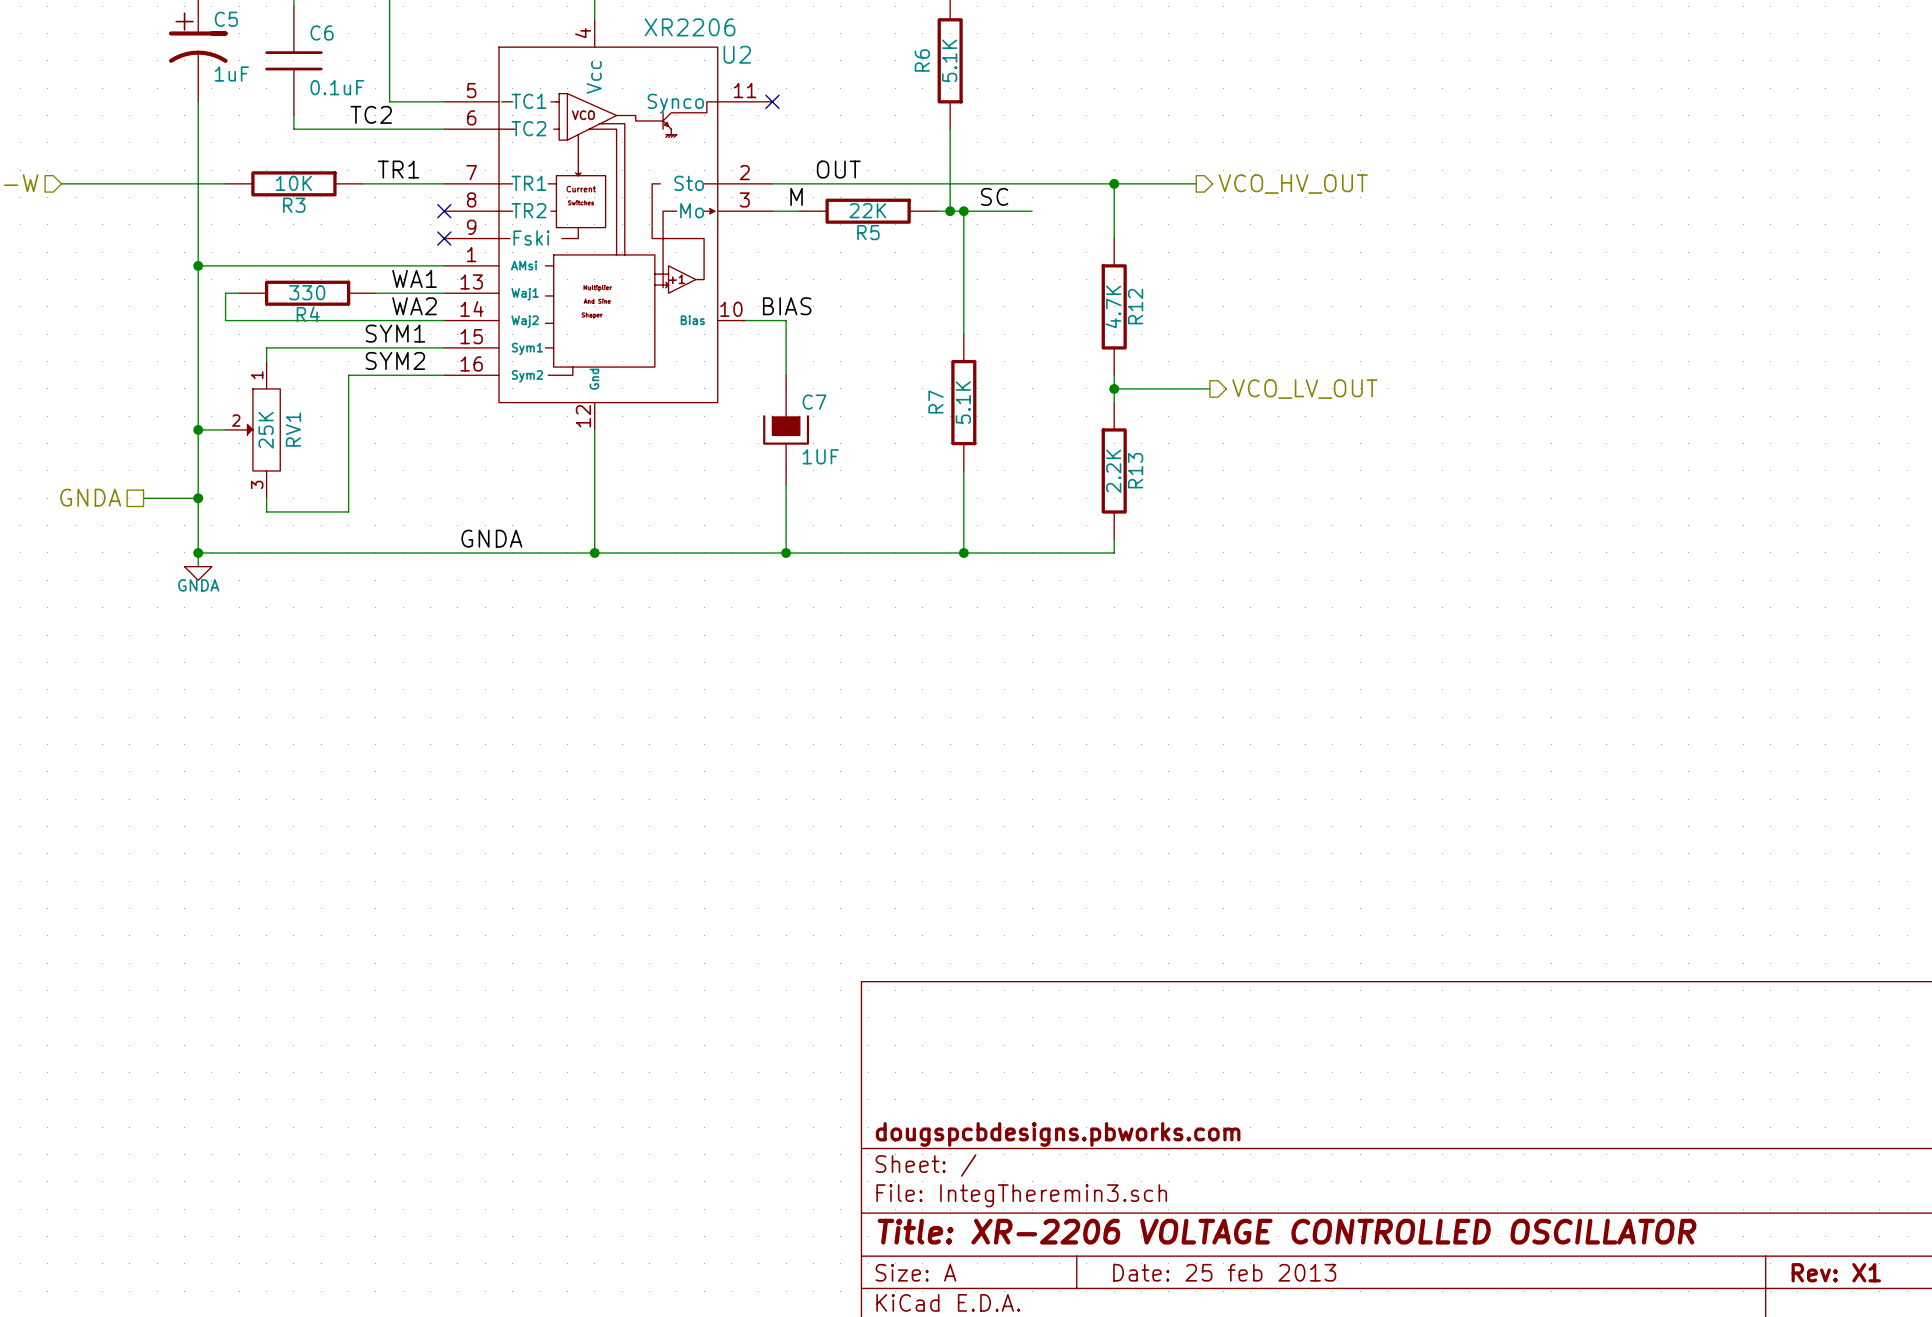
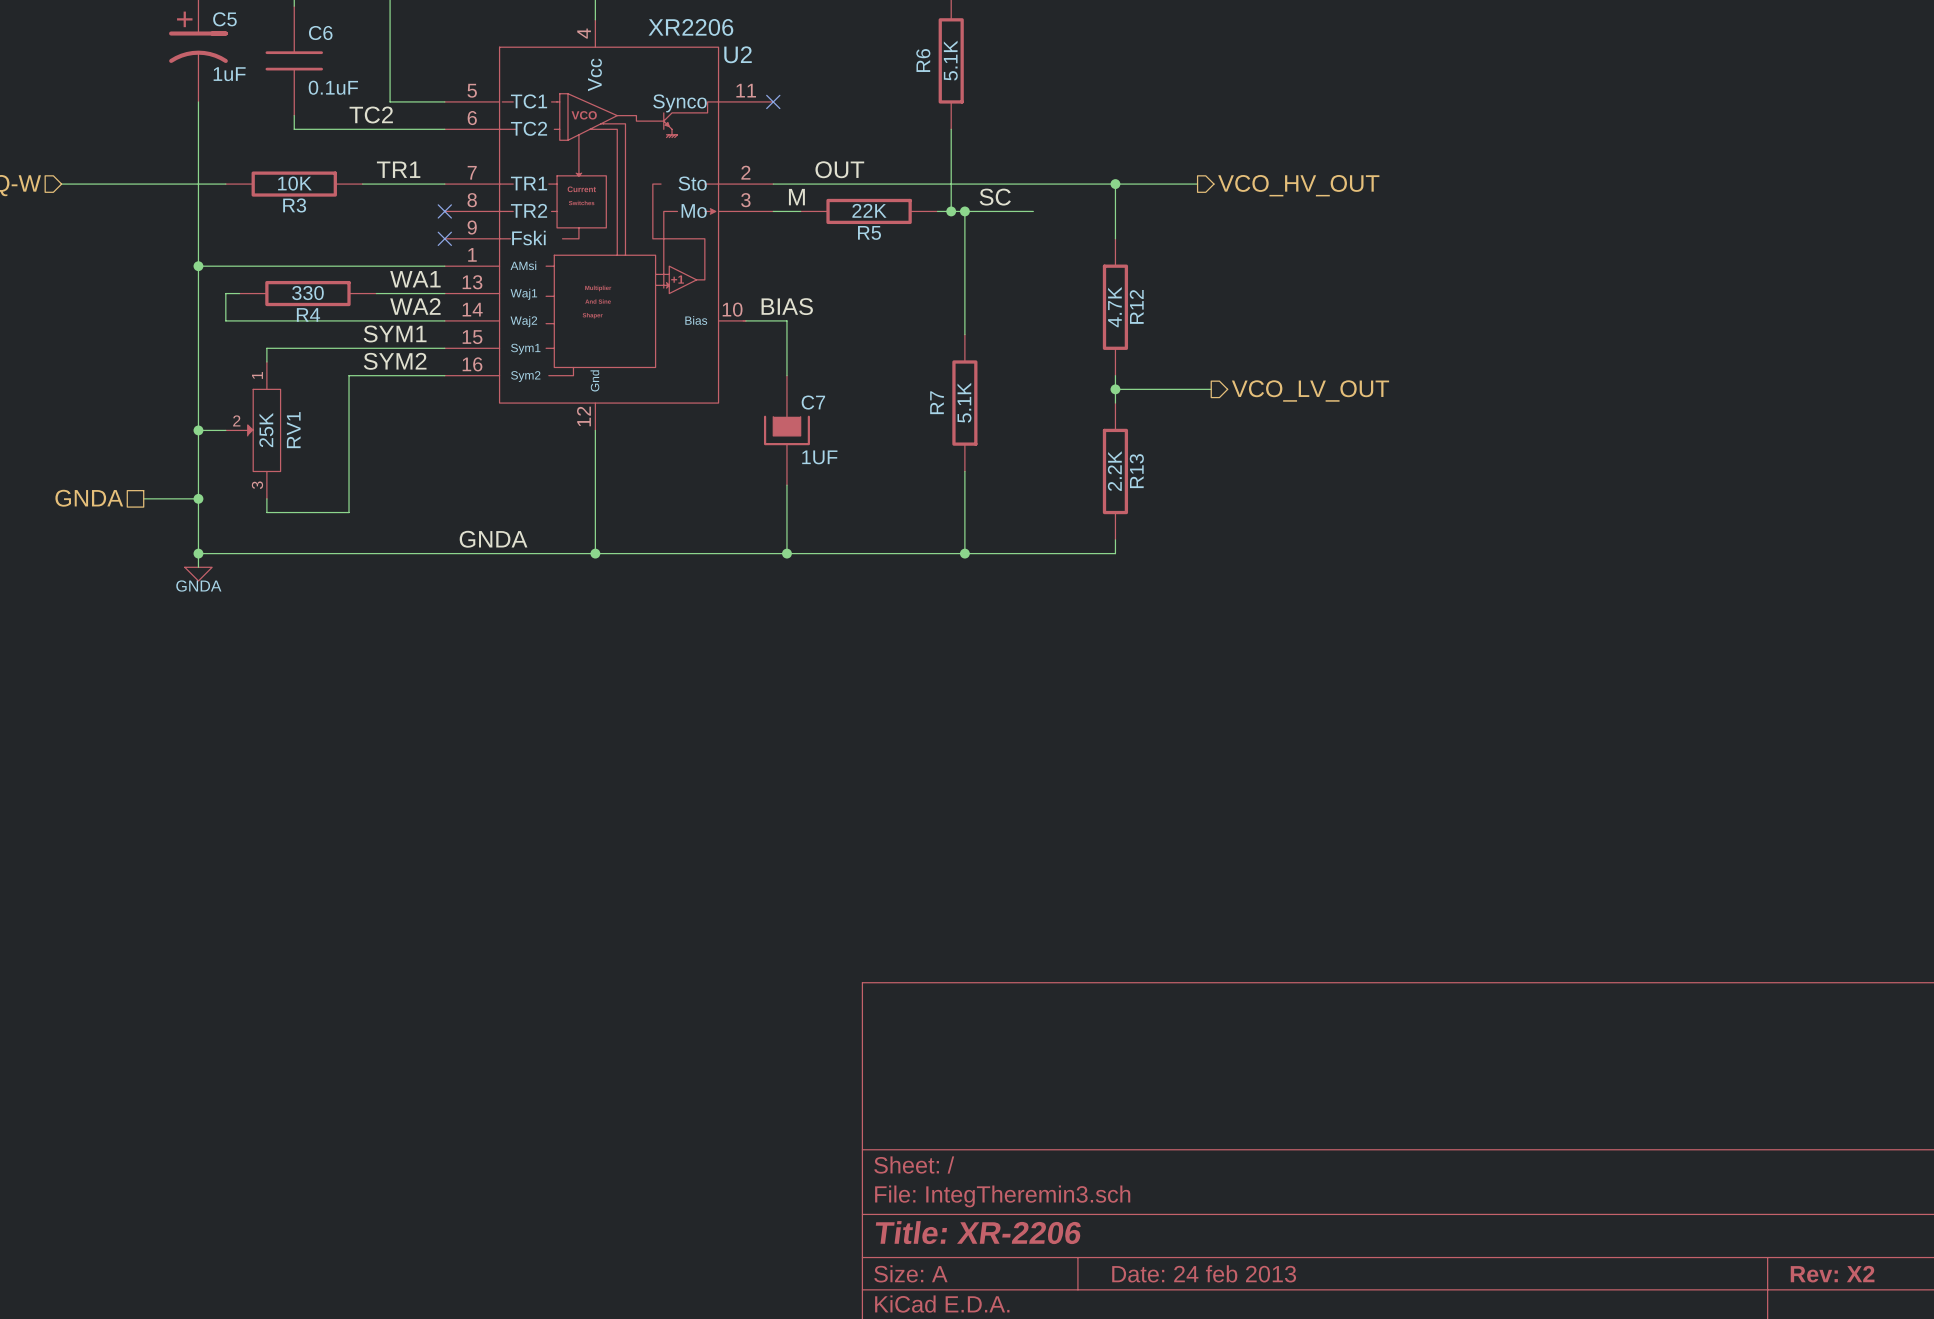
title block: dougspcbdesigns.pbworks.com (1058, 1134) -> none
title block: Title: XR-2206 VOLTAGE CONTROLLED OSCILLATOR (1287, 1231) -> Title: XR-2206 (978, 1232)
title block: Date: 25 feb 2013 (1224, 1272) -> Date: 24 feb 2013 (1204, 1273)
title block: Rev: X1 (1836, 1272) -> Rev: X2 (1832, 1274)

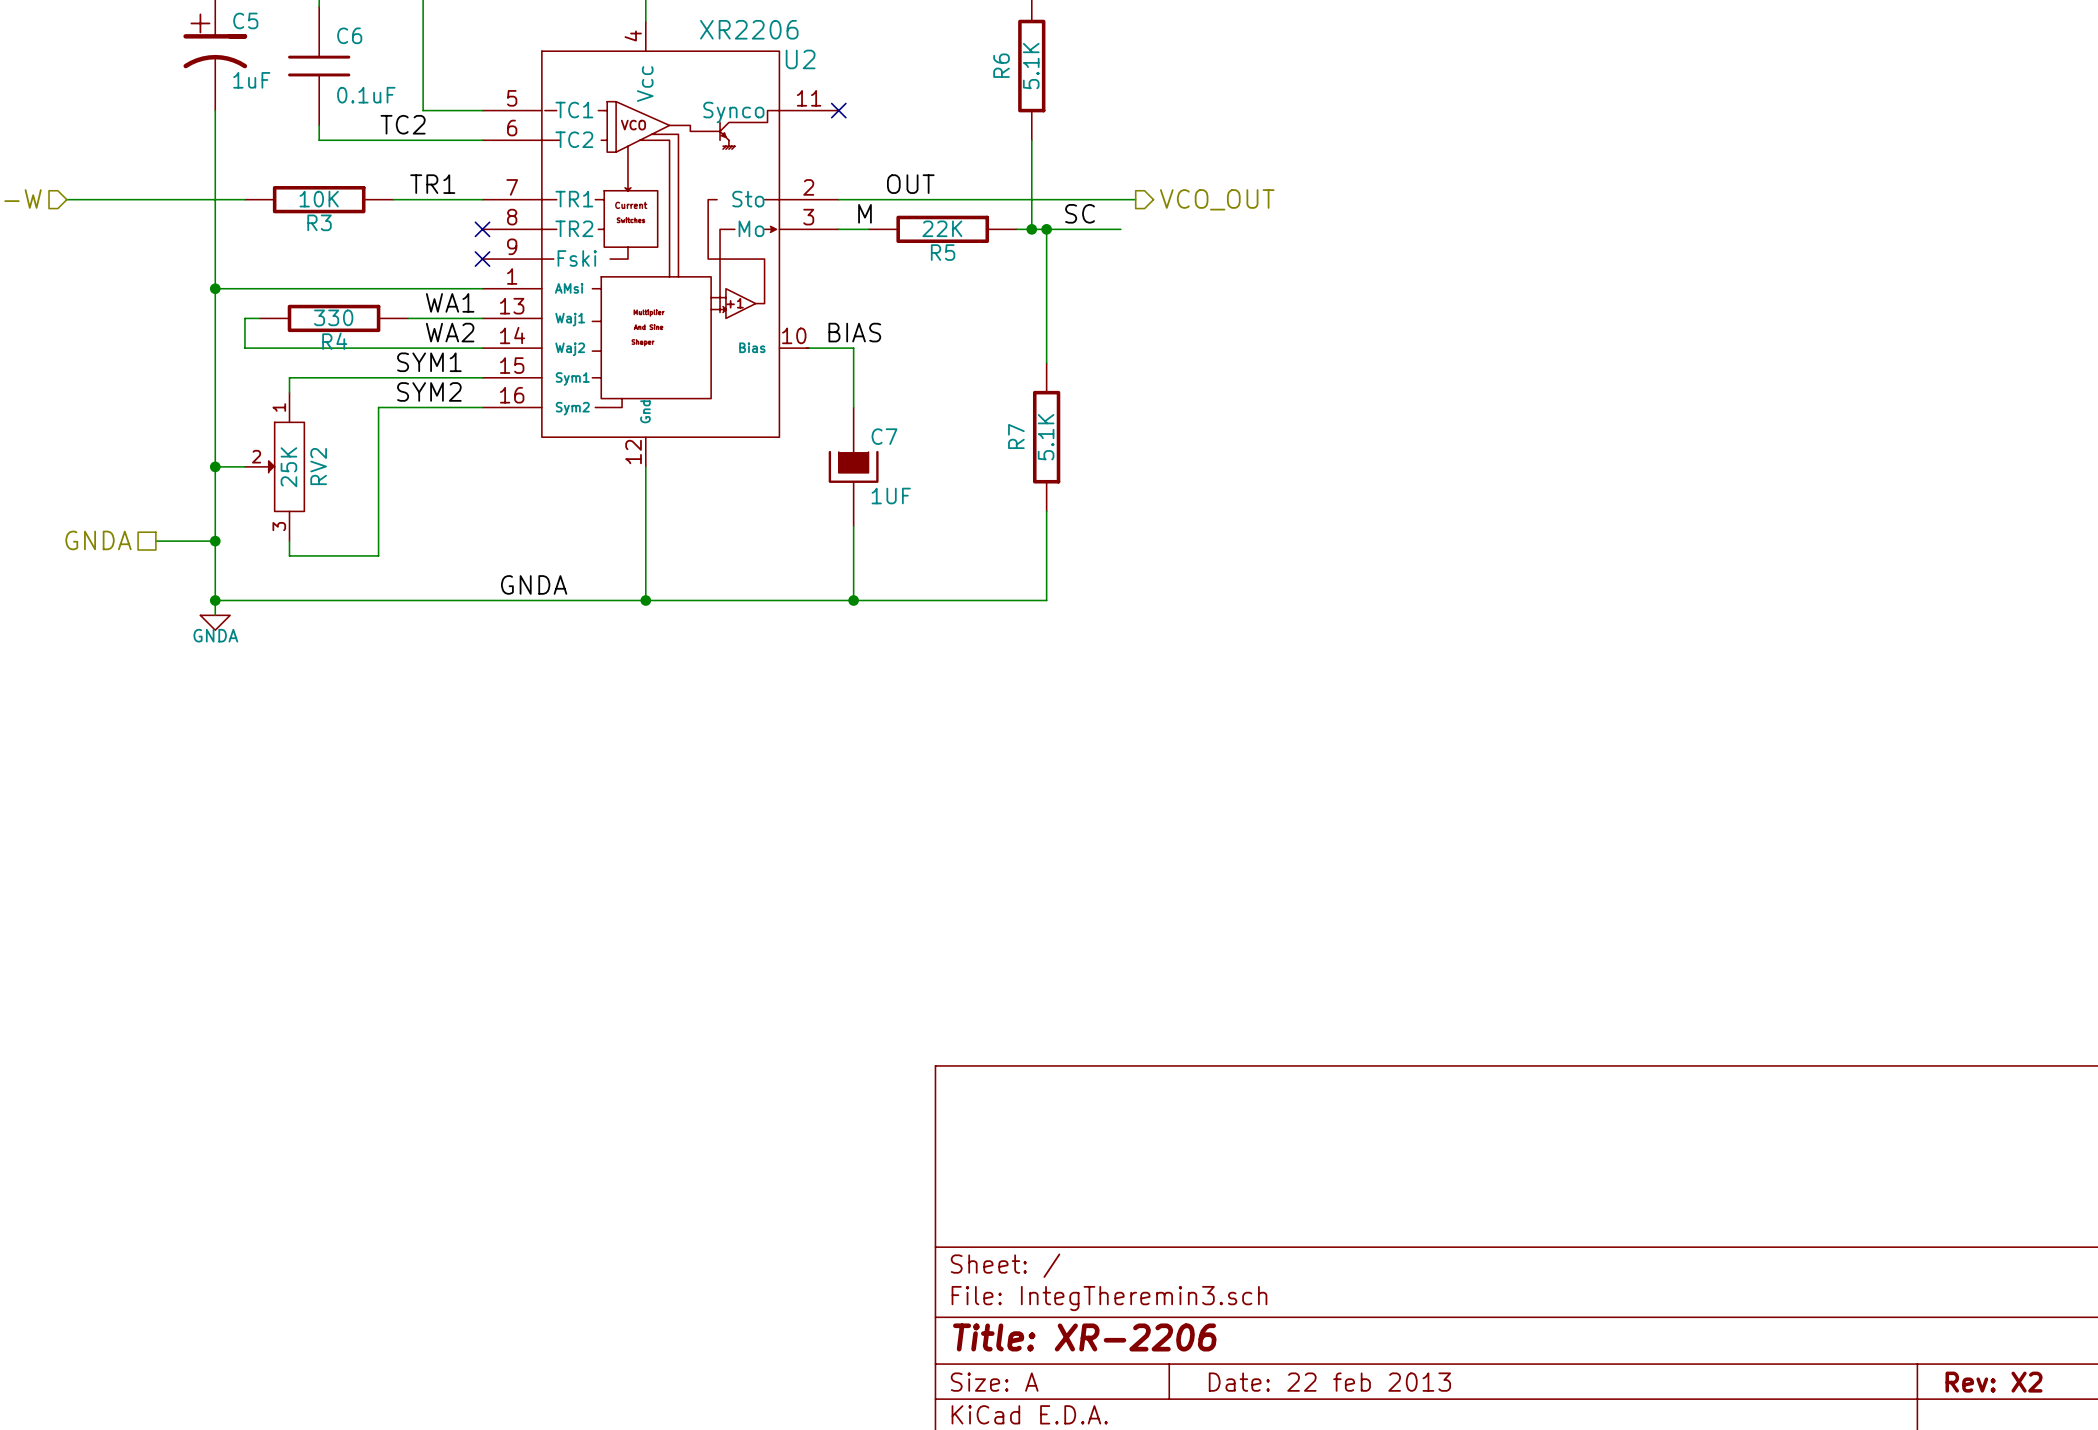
wire: (1047, 184) (1197, 184) -> none
wire: (1115, 184) (1115, 238) -> none
junction: (1115, 184) -> none
hierarchical label: none -> VCO_OUT (1217, 199)
hierarchical label: VCO_HV_OUT (1298, 185) -> none
R12: 4.7K (1115, 307) -> none
wire: (1115, 375) (1115, 403) -> none
wire: (1115, 389) (1211, 389) -> none
junction: (1115, 389) -> none
hierarchical label: VCO_LV_OUT (1310, 391) -> none
RV1 name: RV1 (293, 430) -> RV2 (318, 466)
R13: 2.2K (1115, 471) -> none
wire: (1115, 539) (1115, 553) (964, 553) -> none
junction: (964, 553) -> none
title block: Date: 24 feb 2013 (1204, 1273) -> Date: 22 feb 2013 (1329, 1382)

